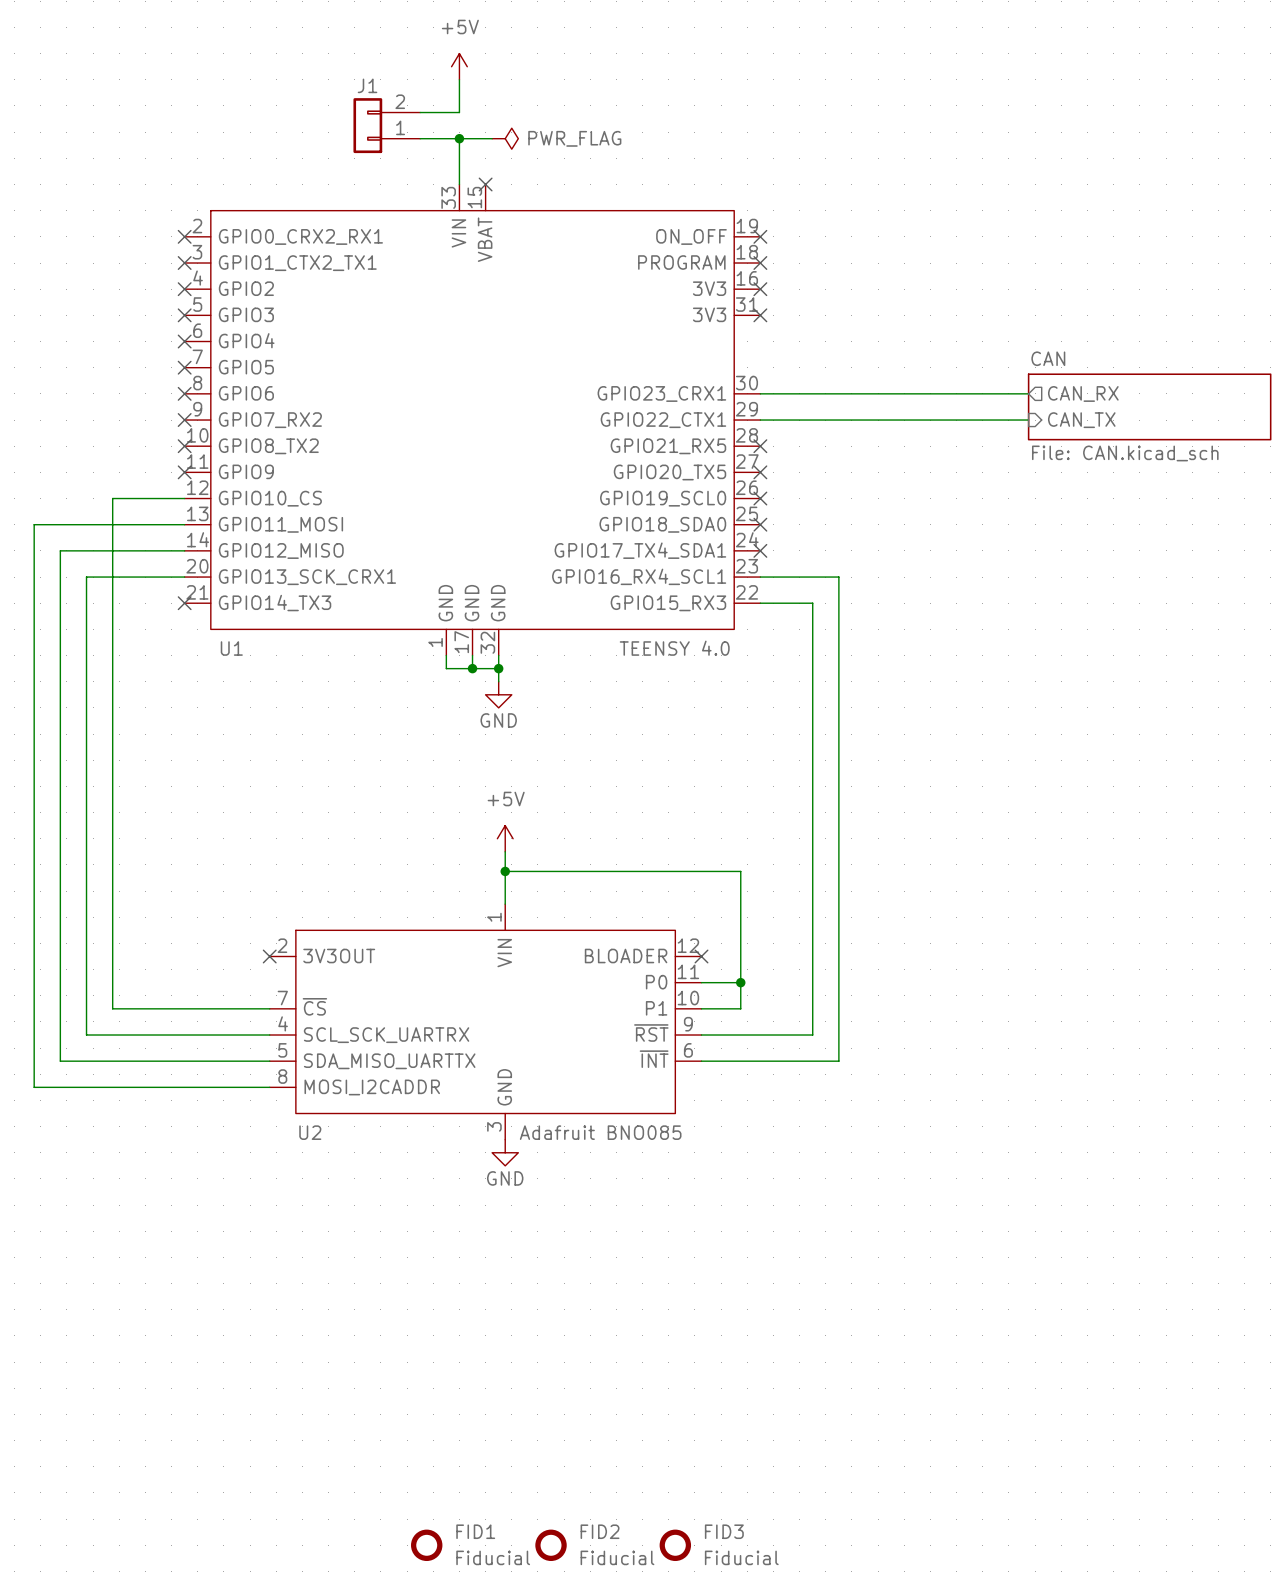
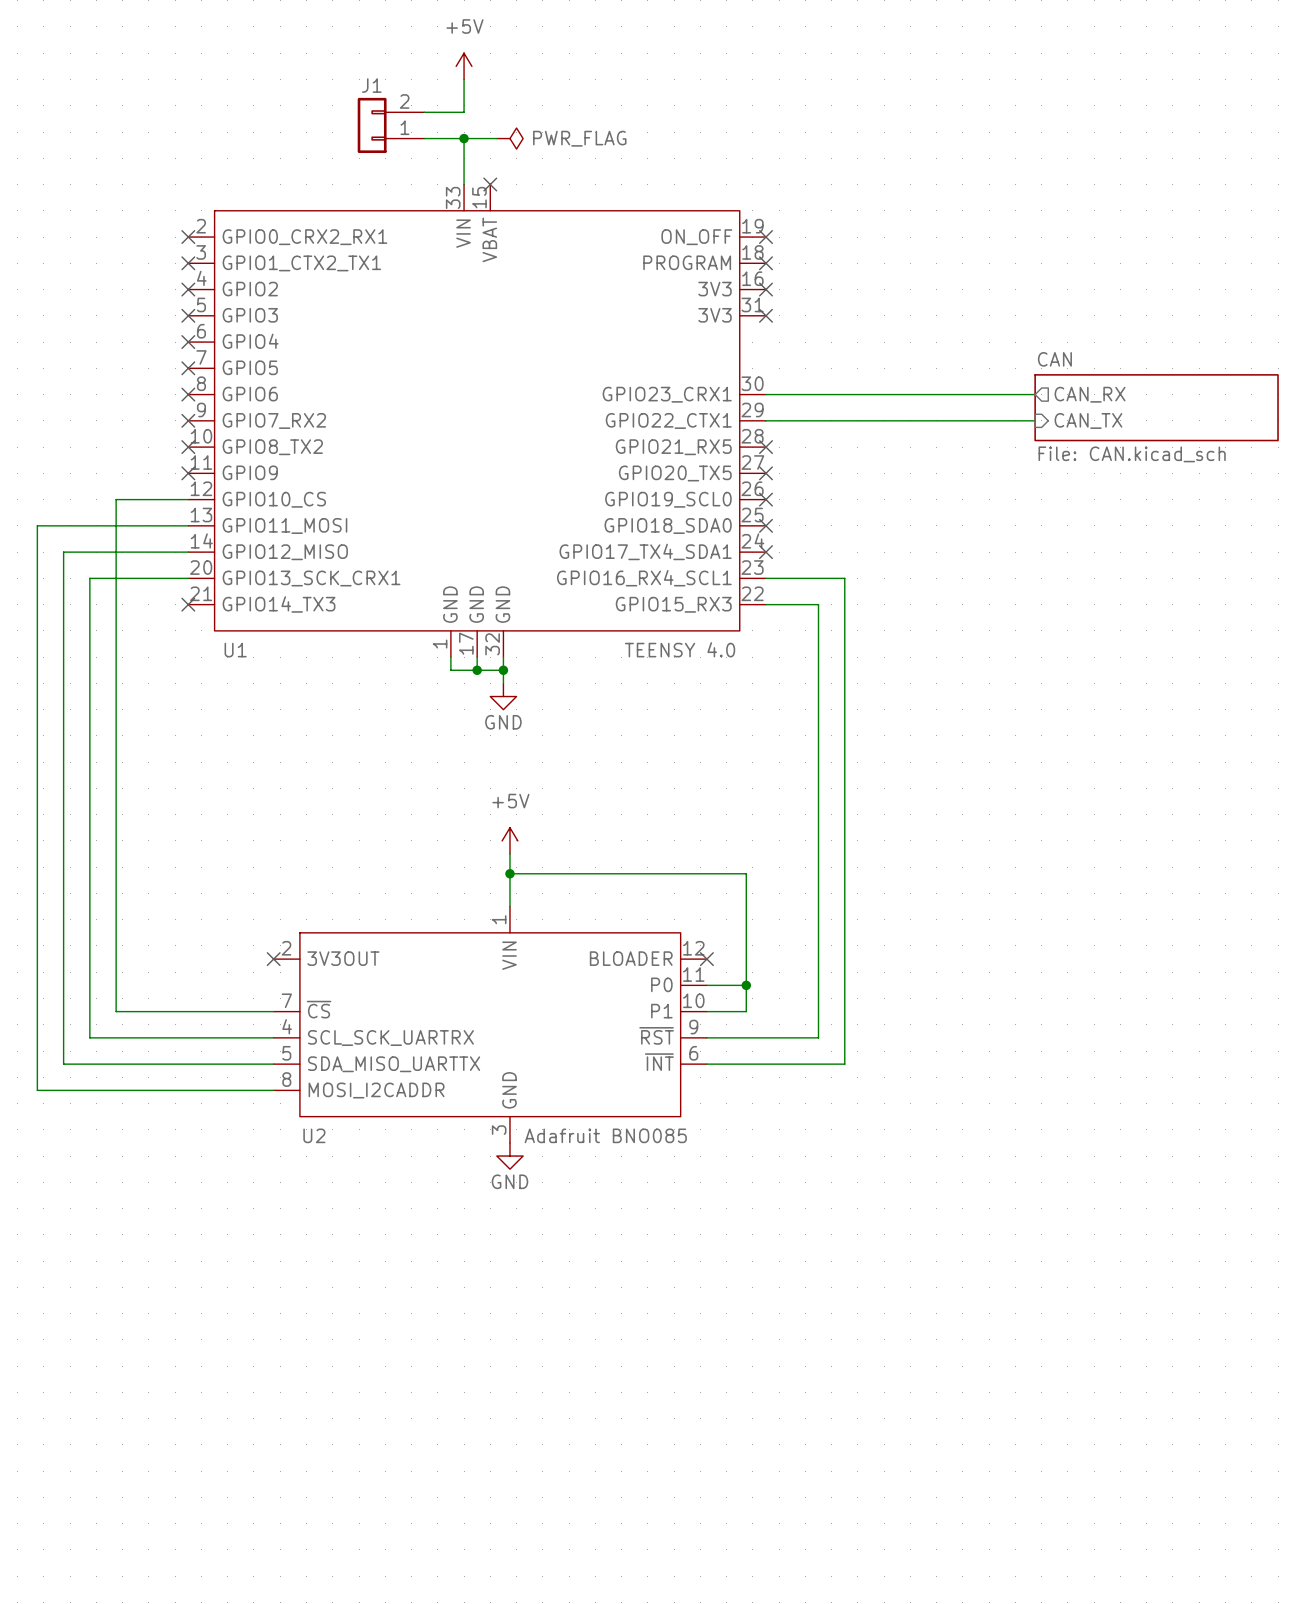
FID1: Fiducial (426, 1545) -> none
FID2: Fiducial (551, 1545) -> none
FID3: Fiducial (675, 1545) -> none

